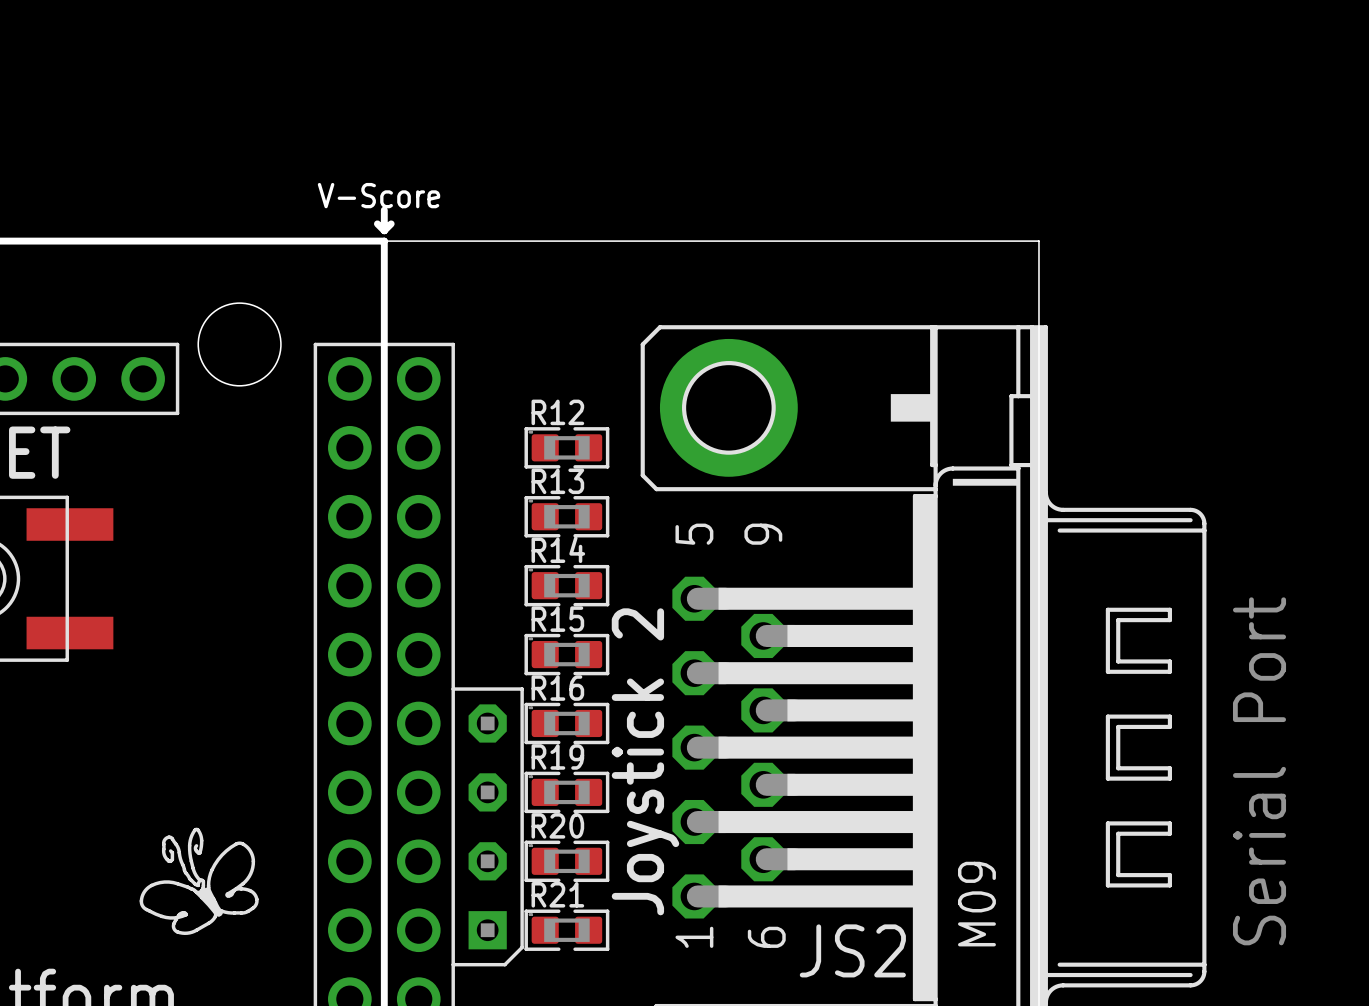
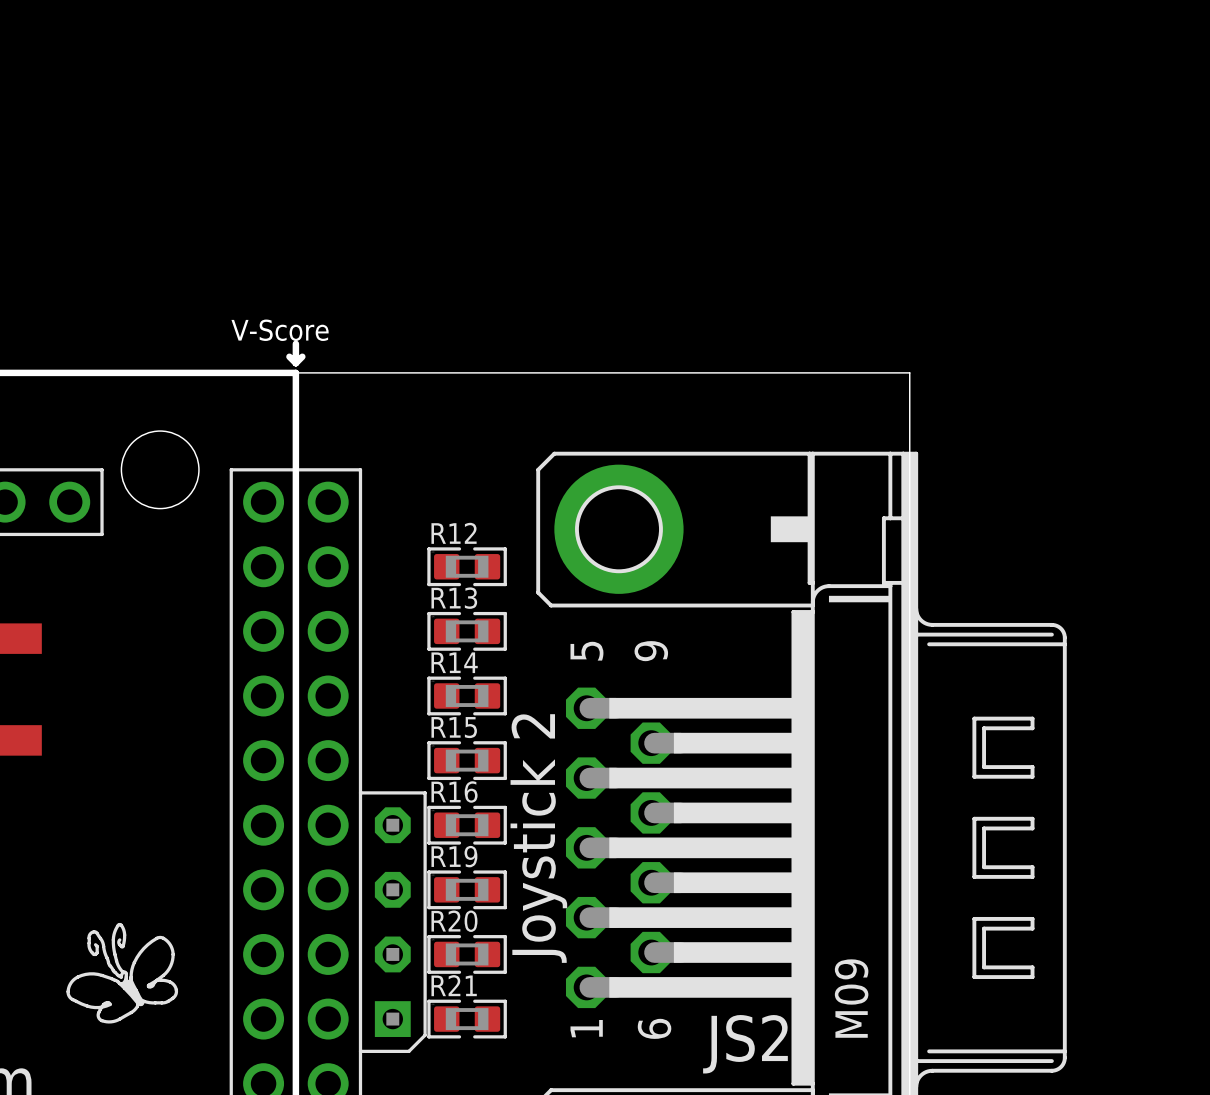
JS2 value: Serial Port (1259, 771) -> none

